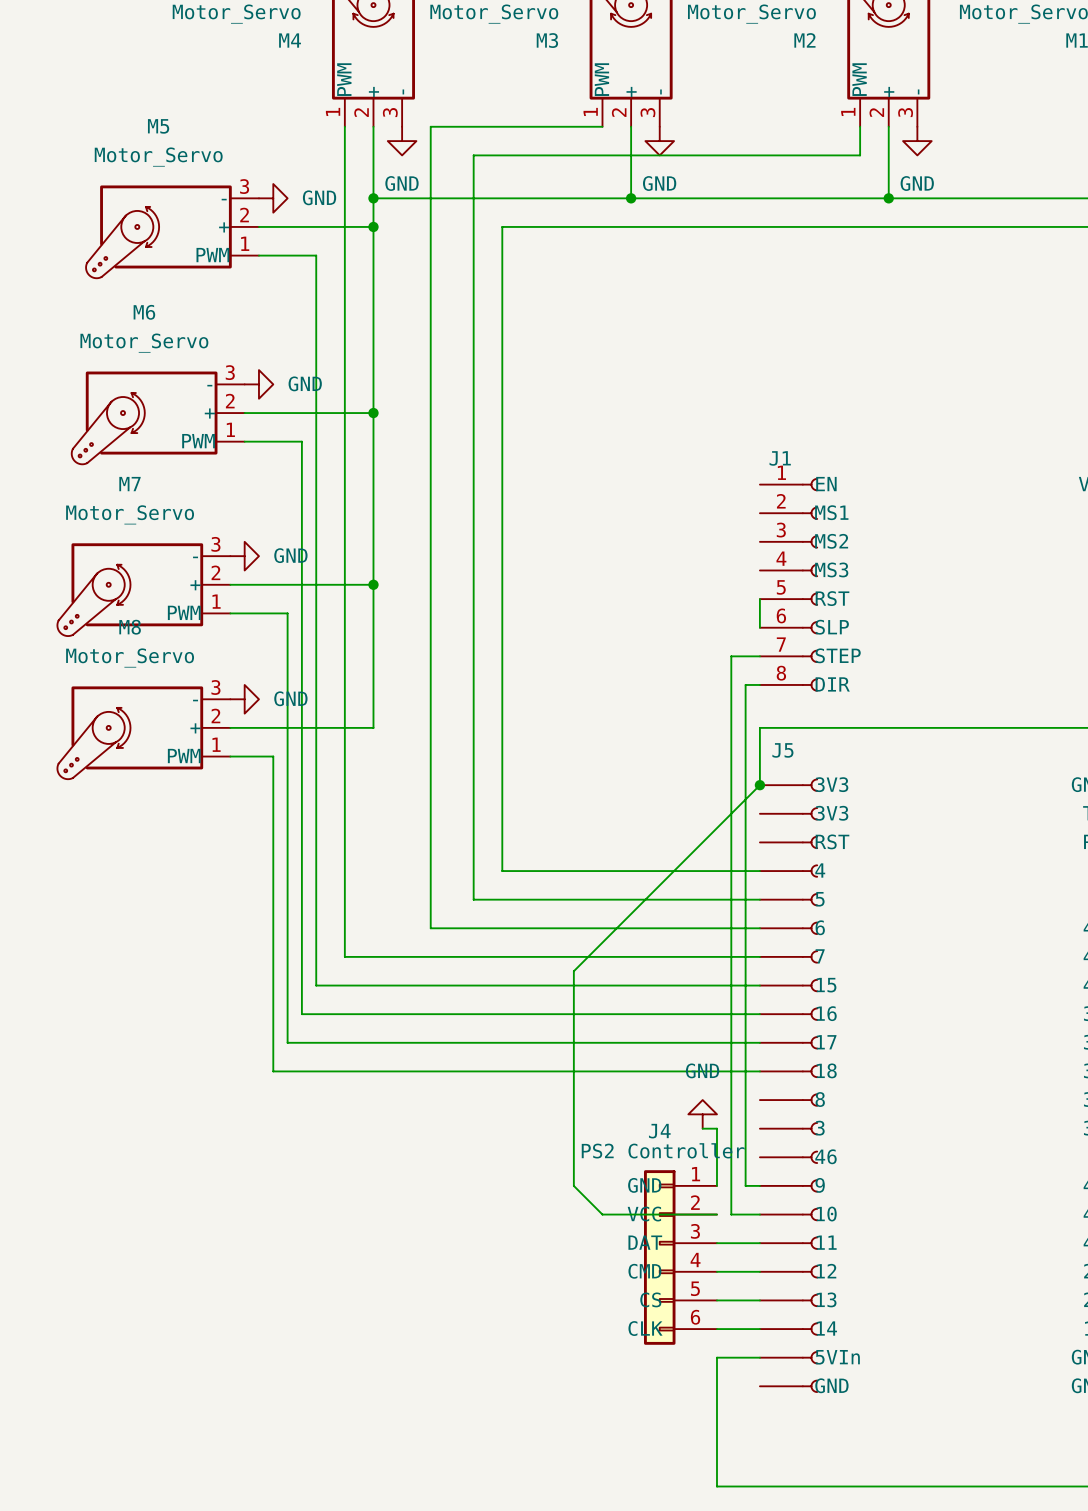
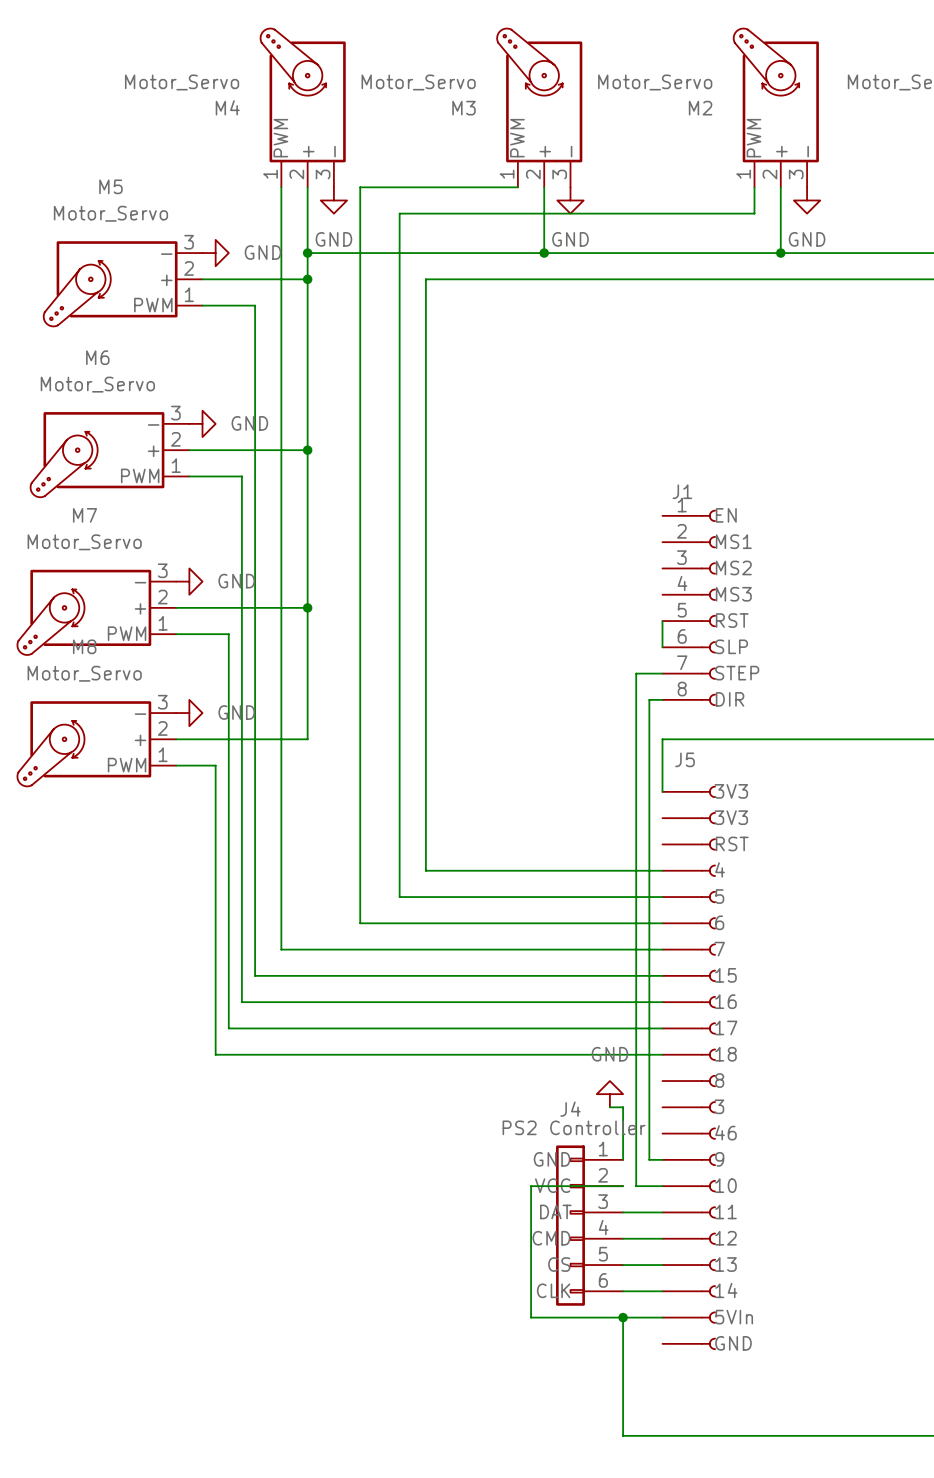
wire: (759, 785) (573, 971) (573, 1185) (602, 1214) (616, 1214) -> (623, 1317) (531, 1317) (531, 1186)
junction: (759, 785) -> none
junction: none -> (623, 1317)

